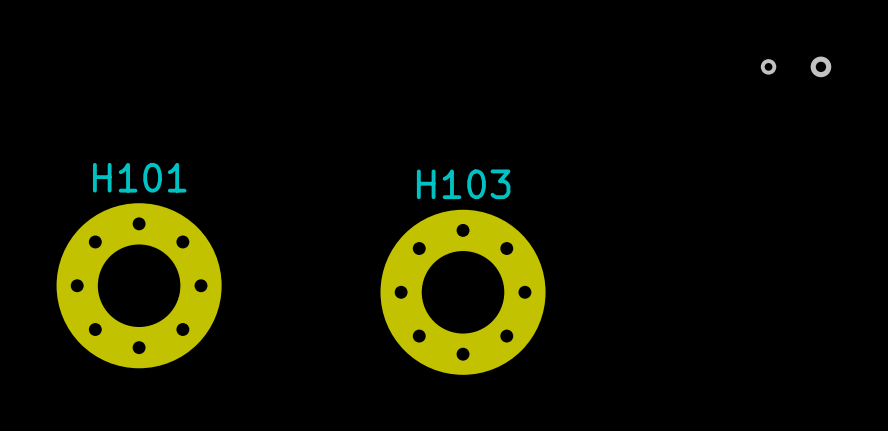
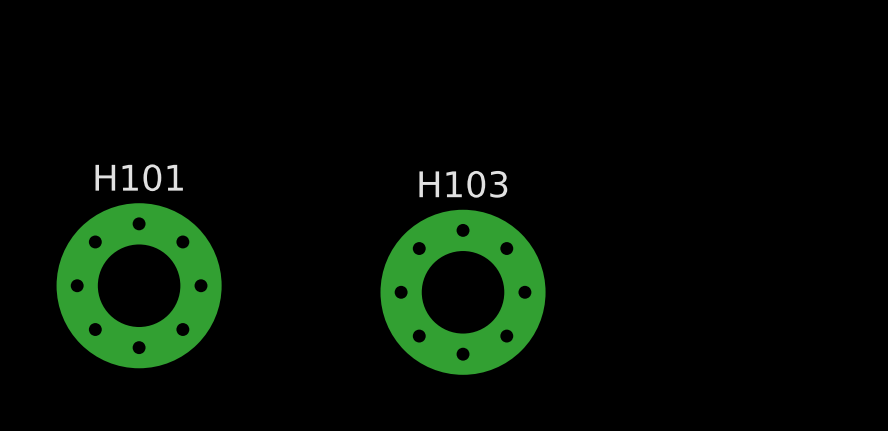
via: (768, 66) -> none
via: (820, 66) -> none

